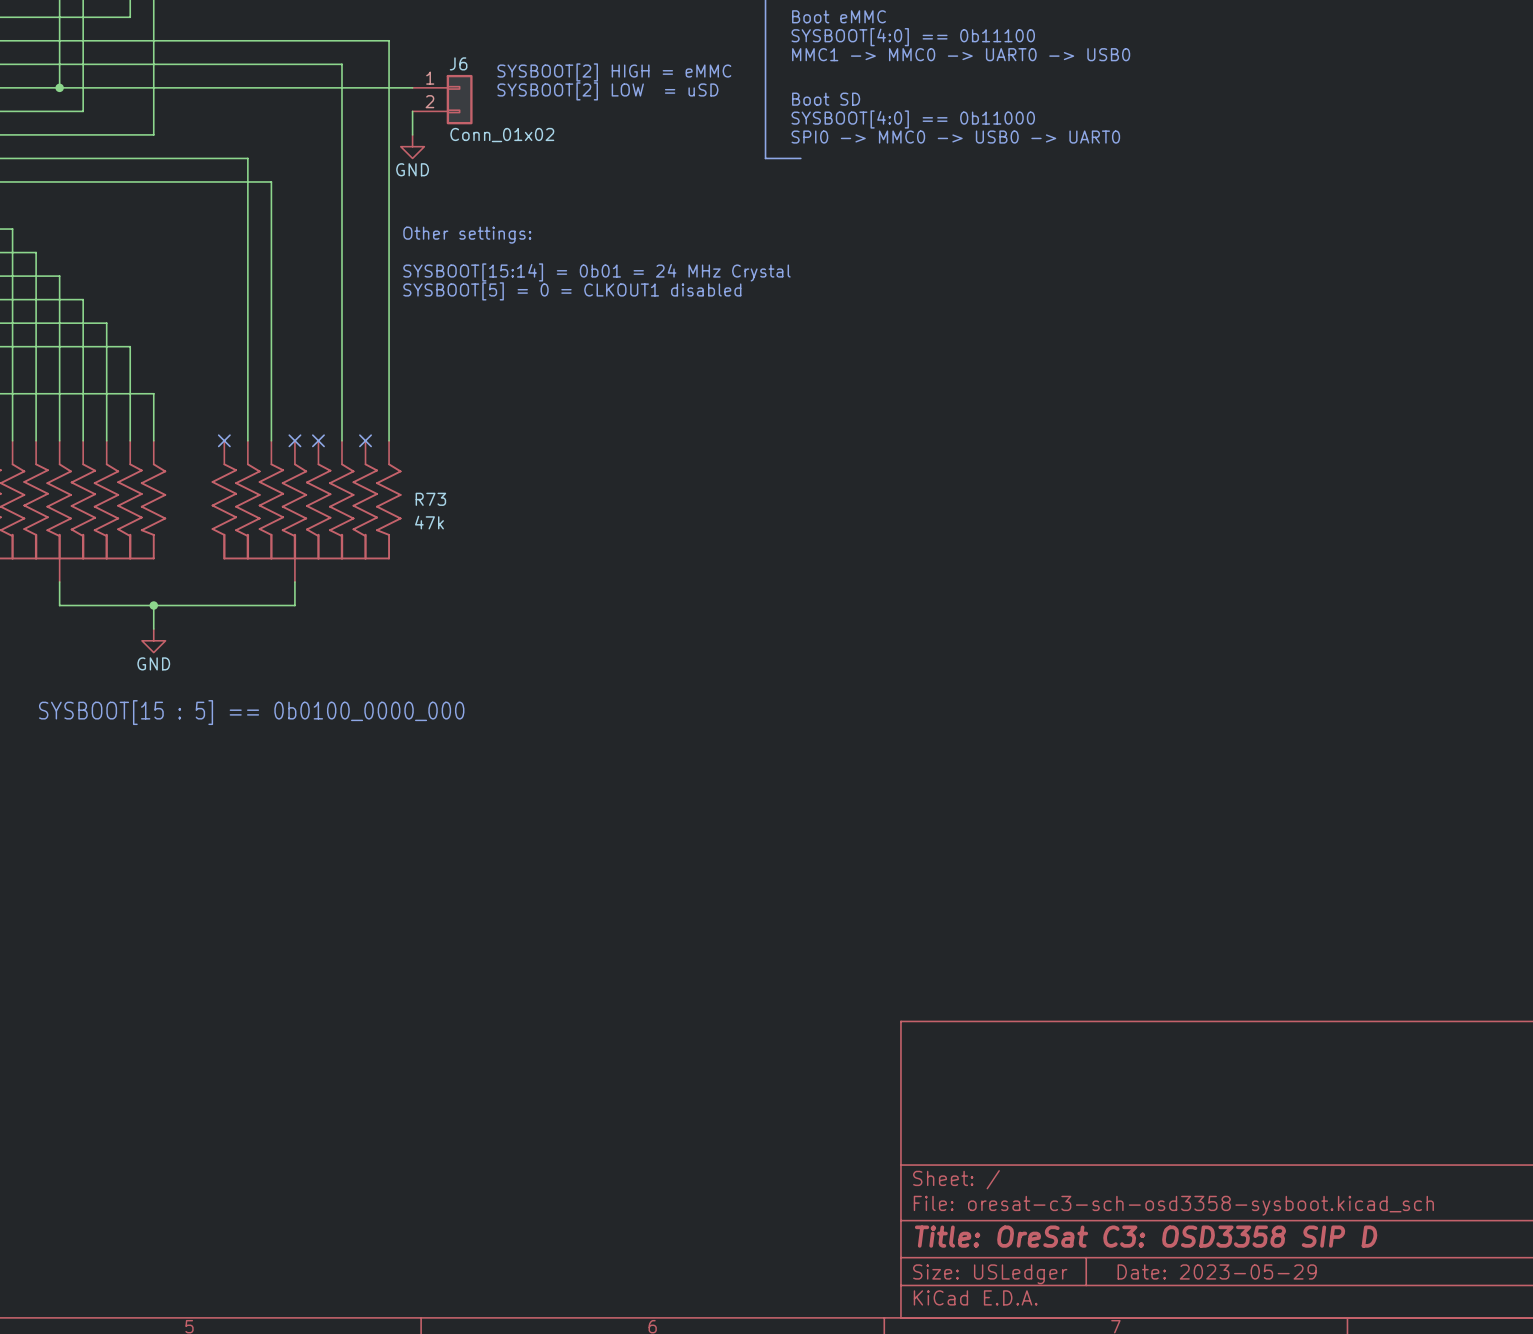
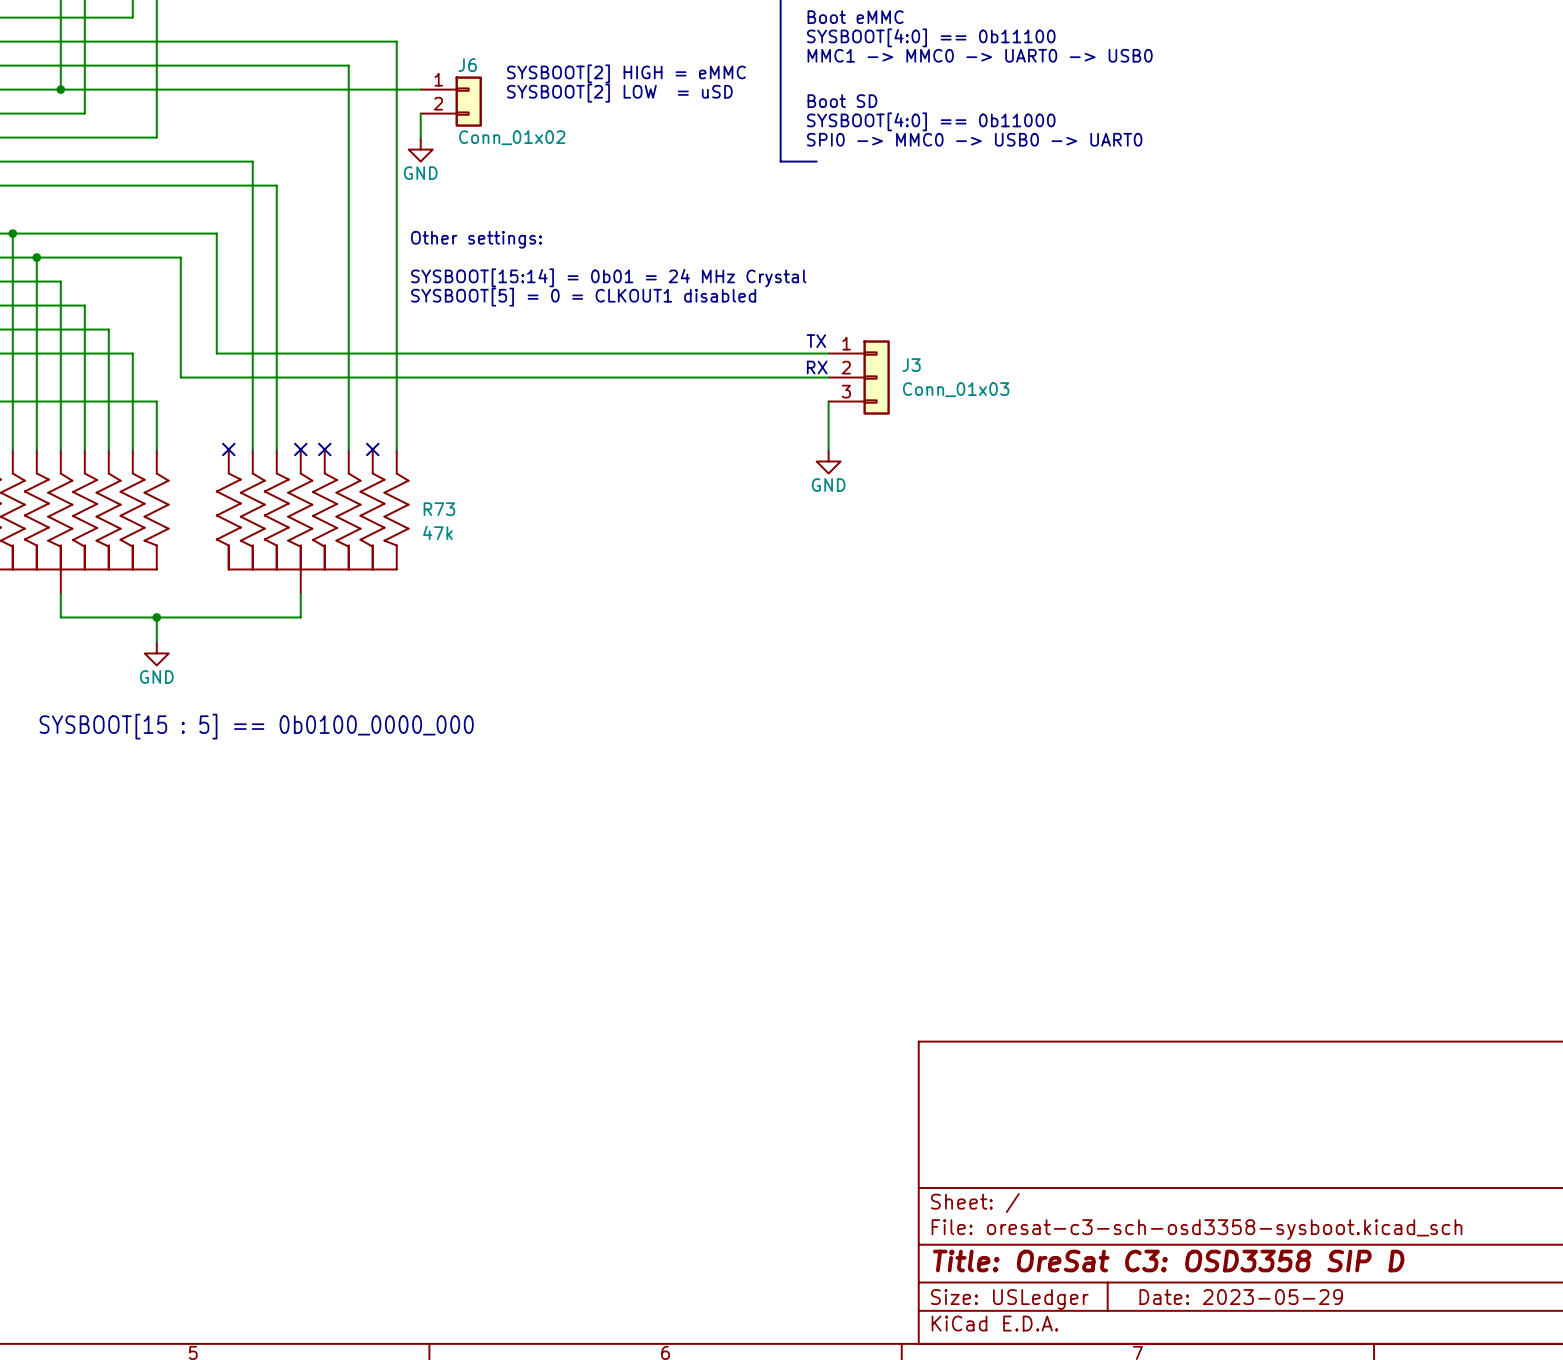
wire: none -> (12, 233) (216, 233) (216, 353) (828, 353)
junction: none -> (12, 233)
wire: none -> (36, 257) (180, 257) (180, 377) (828, 377)
junction: none -> (36, 257)
text: none -> TX (816, 341)
text: none -> RX (817, 367)
J3: none -> Conn_01x03 (859, 377)
wire: none -> (828, 401) (828, 449)
power symbol: none -> GND (828, 461)

